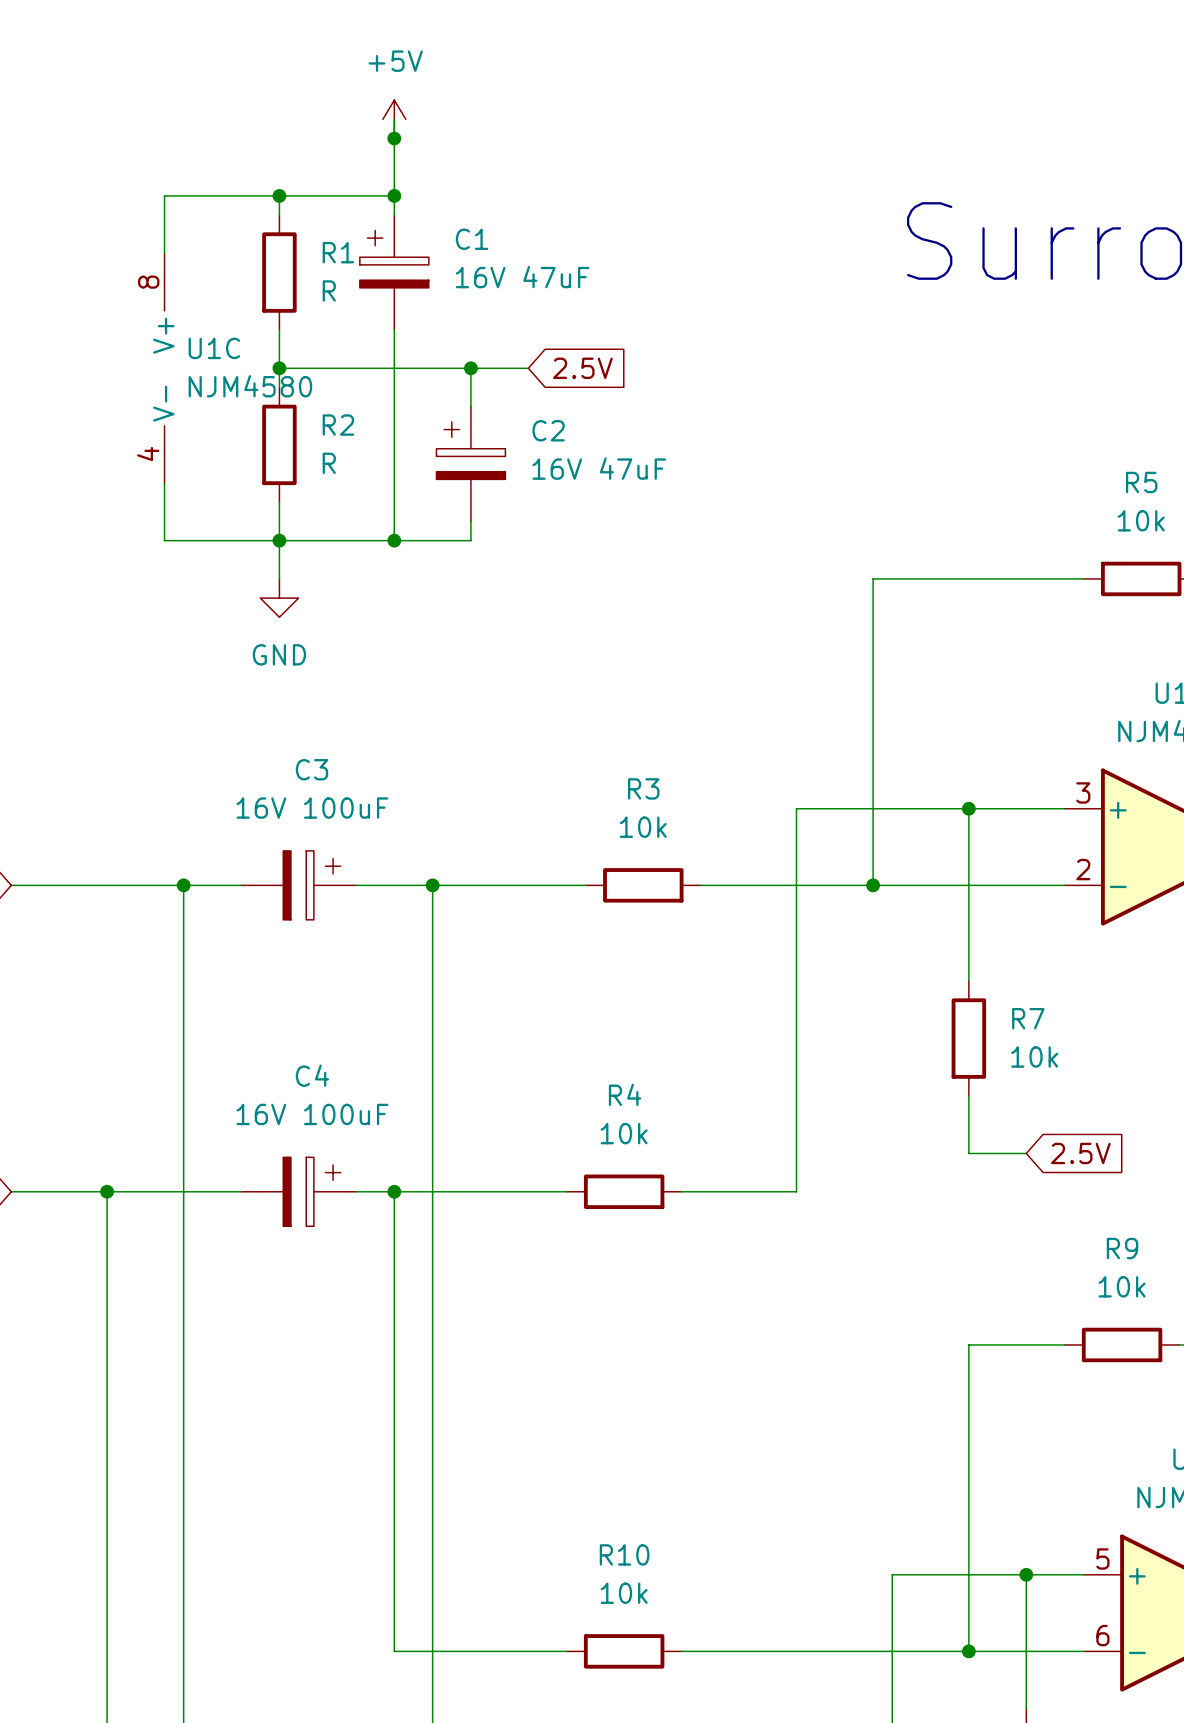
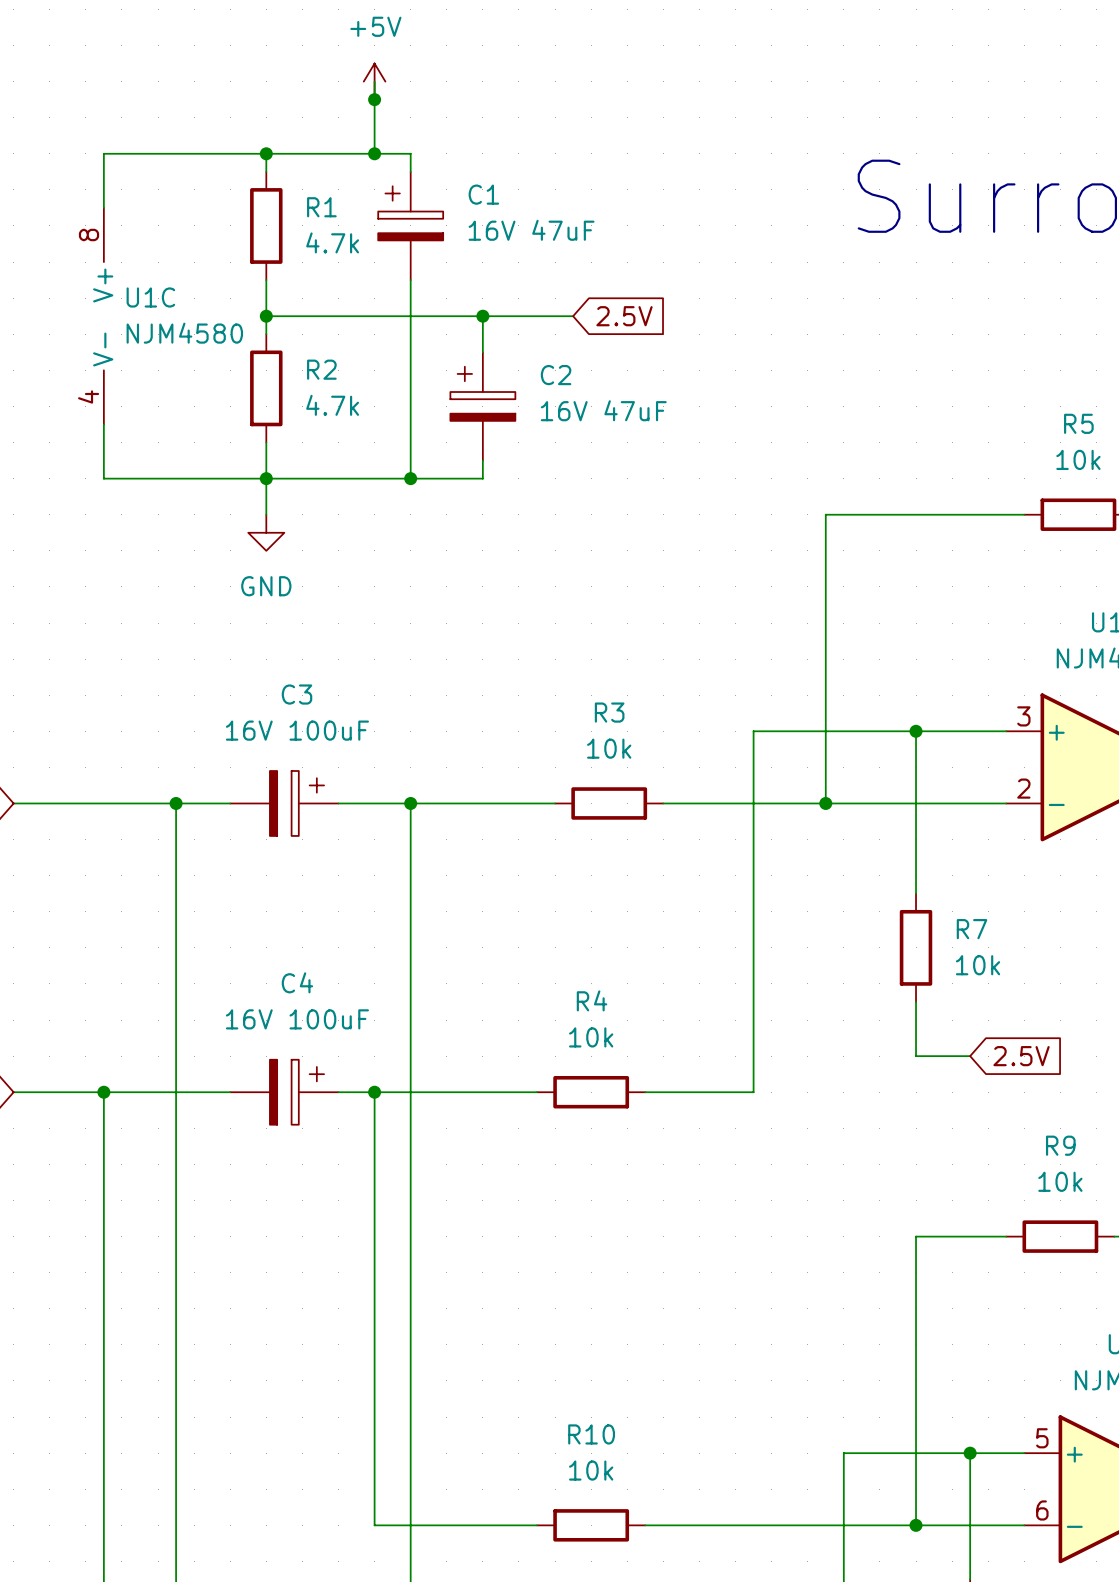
wire: (164, 195) (164, 253) -> (158, 153) (103, 153) (103, 207)
wire: (394, 195) (394, 215) -> (374, 153) (410, 153) (410, 171)
C1 position: (394, 272) -> (410, 225)
R1 value: R (329, 290) -> 4.7k (332, 242)
wire: (394, 329) (394, 540) -> (410, 280) (410, 478)
U1C position: (164, 368) -> (103, 316)
wire: (470, 368) (470, 406) -> (482, 316) (482, 352)
junction position: (470, 368) -> (482, 316)
wire: none -> (500, 316) (573, 316)
global label position: 2.5V (582, 368) -> 2.5V (624, 316)
R2 value: R (329, 463) -> 4.7k (332, 405)
C2 position: (470, 464) -> (482, 406)
wire: (164, 483) (164, 540) -> (103, 424) (103, 478) (158, 478)
wire: (470, 521) (470, 540) -> (482, 460) (482, 478) (446, 478)
junction position: (394, 540) -> (410, 478)

